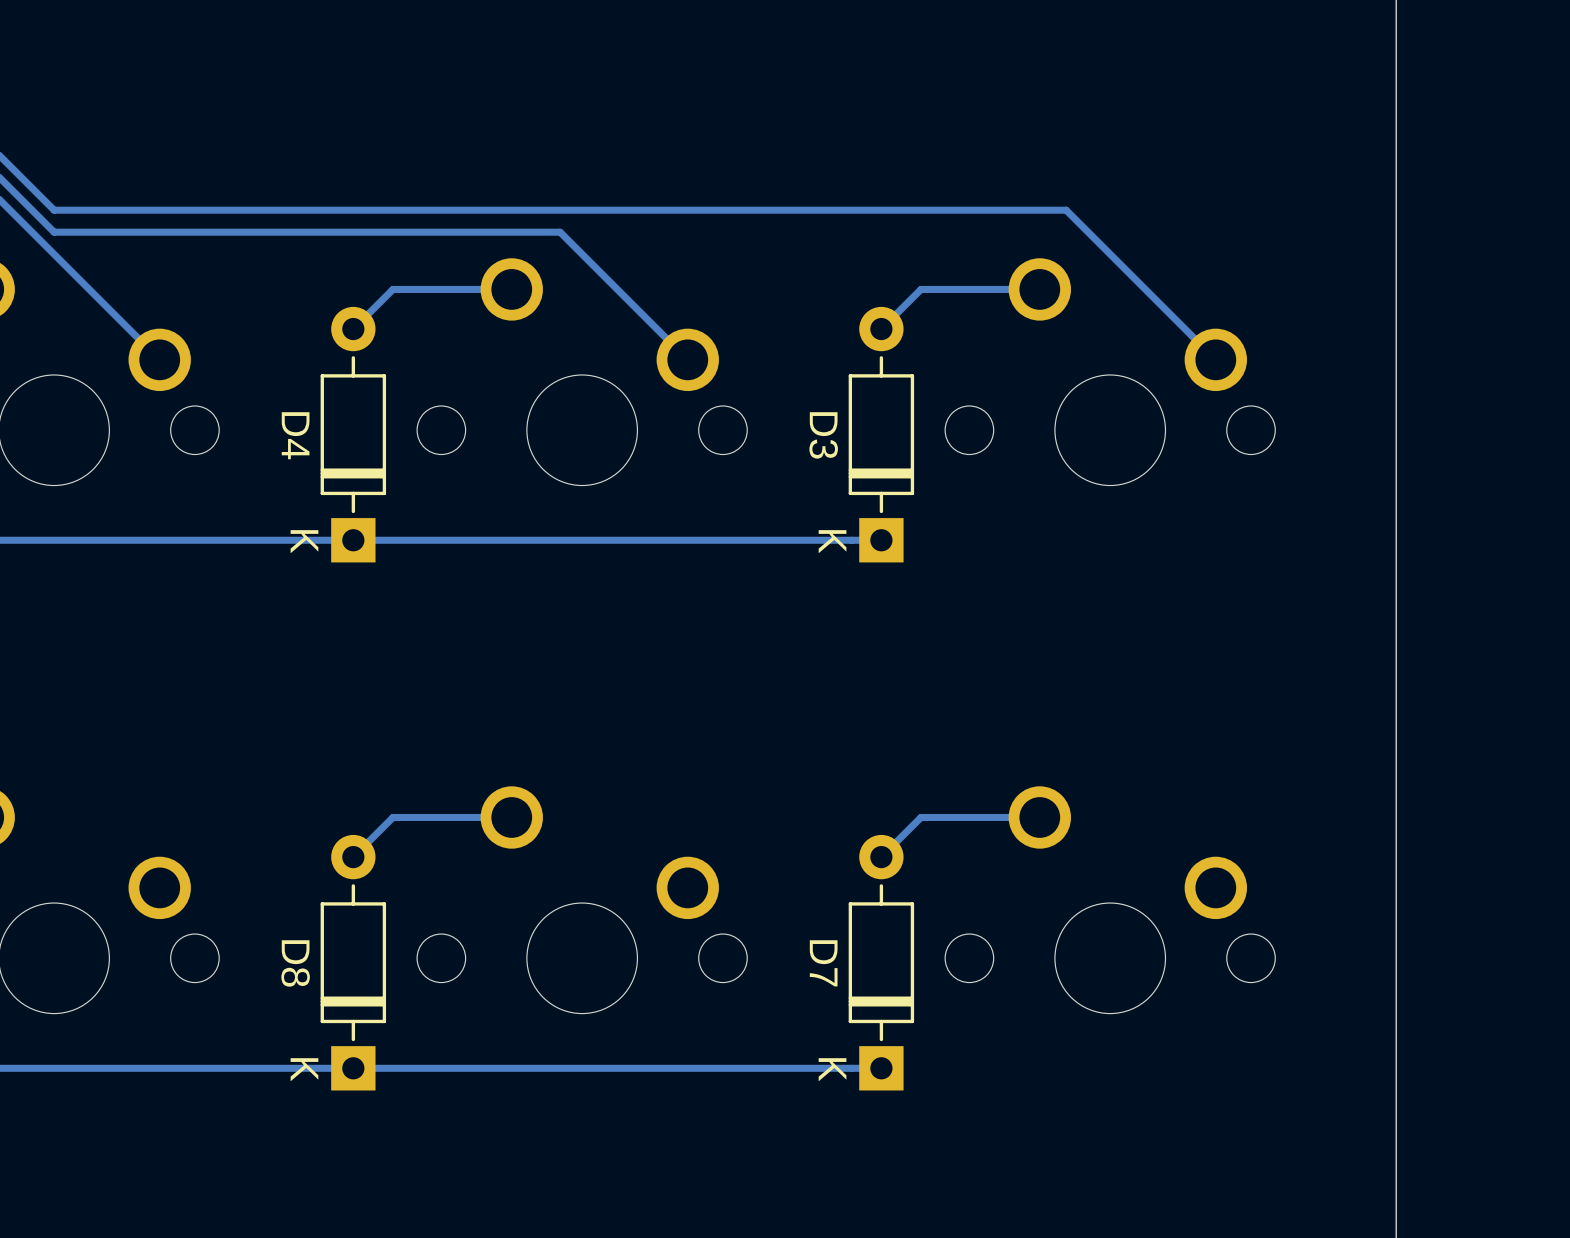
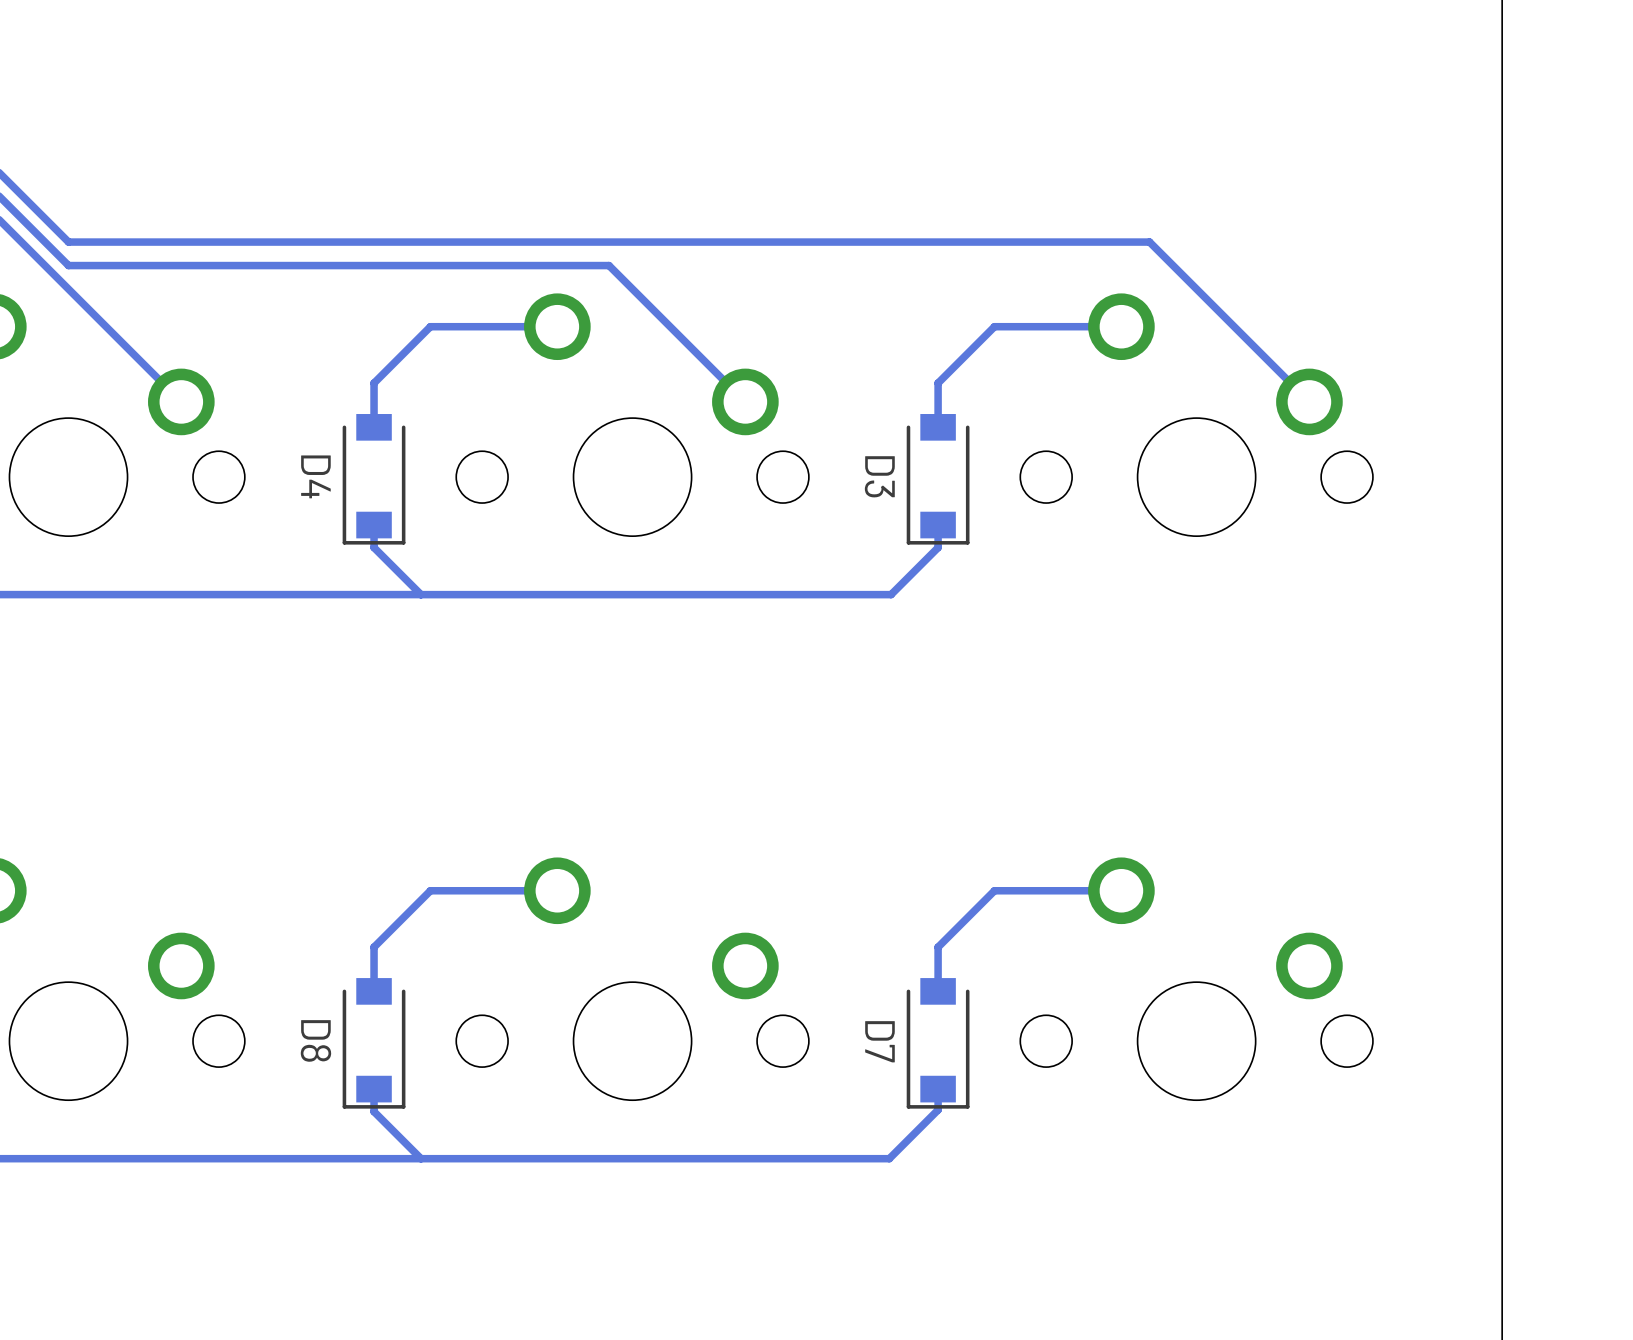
D4 footprint: [320, 306, 387, 563] -> [342, 414, 406, 545]
D3 footprint: [848, 306, 915, 563] -> [906, 414, 970, 545]
track: none -> (388, 369) (374, 383) (374, 427)
track: none -> (952, 369) (938, 383) (938, 427)
track: none -> (374, 525) (374, 547) (421, 594)
track: (881, 540) (824, 540) -> (938, 525) (938, 547) (891, 594)
D8 footprint: [320, 834, 387, 1091] -> [342, 978, 406, 1109]
D7 footprint: [848, 834, 915, 1091] -> [906, 978, 970, 1109]
track: none -> (388, 933) (374, 947) (374, 991)
track: none -> (952, 933) (938, 947) (938, 991)
track: none -> (374, 1089) (374, 1111) (421, 1158)
track: (881, 1068) (822, 1068) -> (938, 1089) (938, 1109) (889, 1158)

